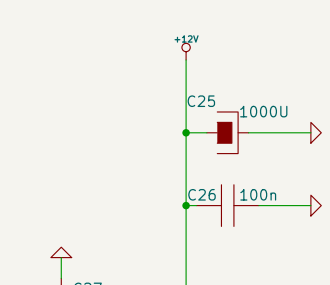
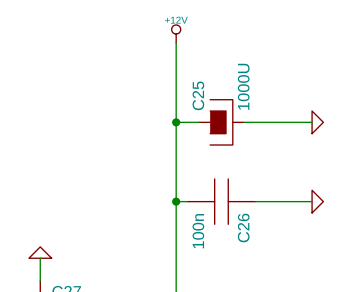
C25 name rotation: 0° (201, 101) -> 90° counterclockwise (198, 95)
C25 value rotation: 0° (263, 111) -> 90° counterclockwise (243, 86)
C26 name rotation: 0° (202, 194) -> 90° counterclockwise (243, 227)
C26 name position: C26 (202, 194) -> C26 (243, 227)
C26 value rotation: 0° (258, 194) -> 90° counterclockwise (198, 231)
C26 value position: 100n (258, 194) -> 100n (198, 231)

